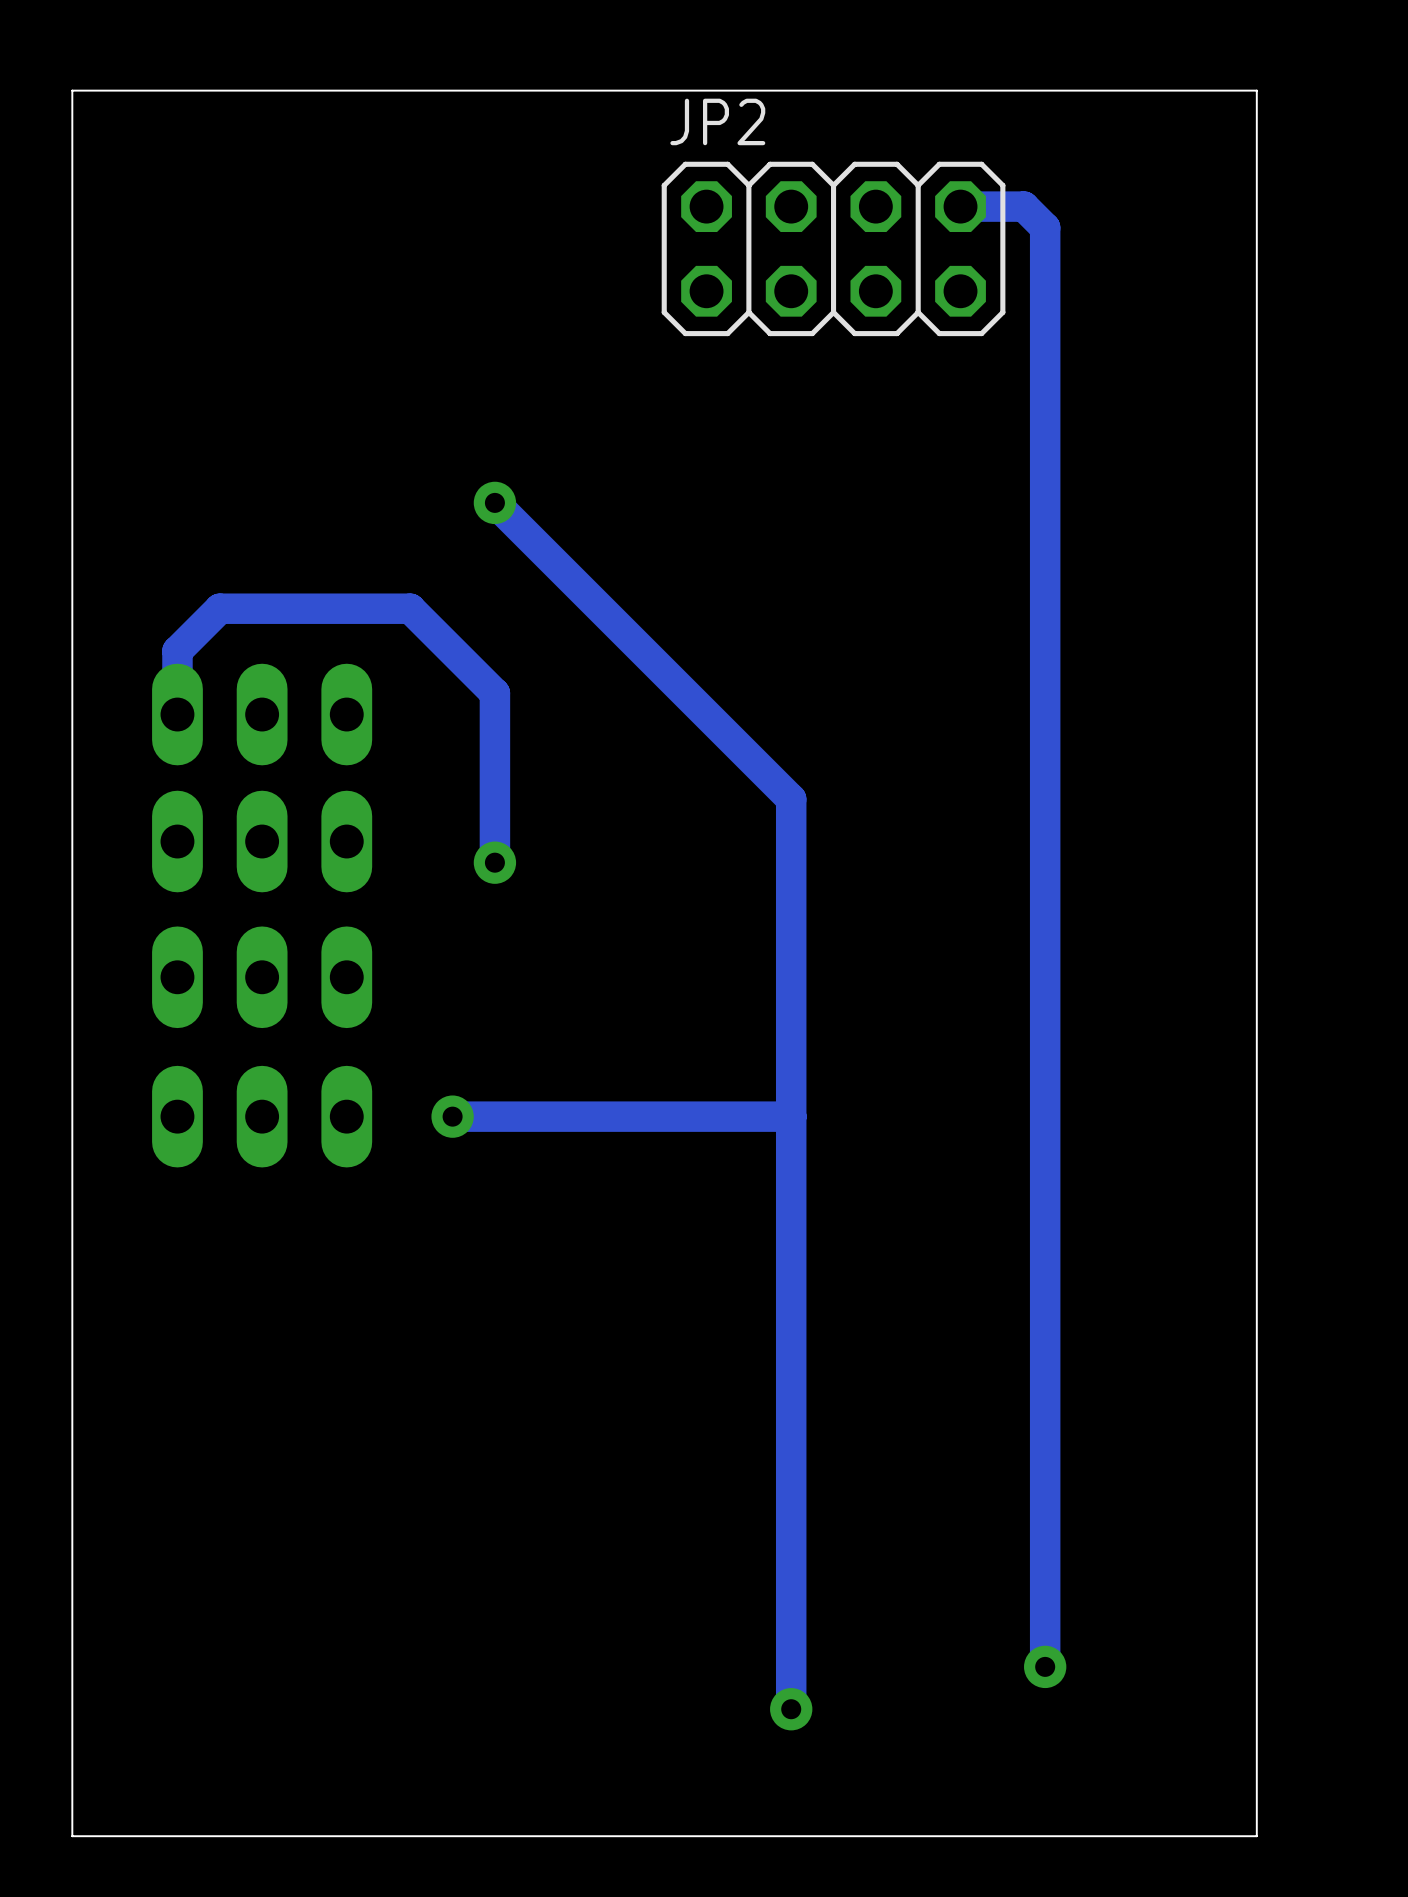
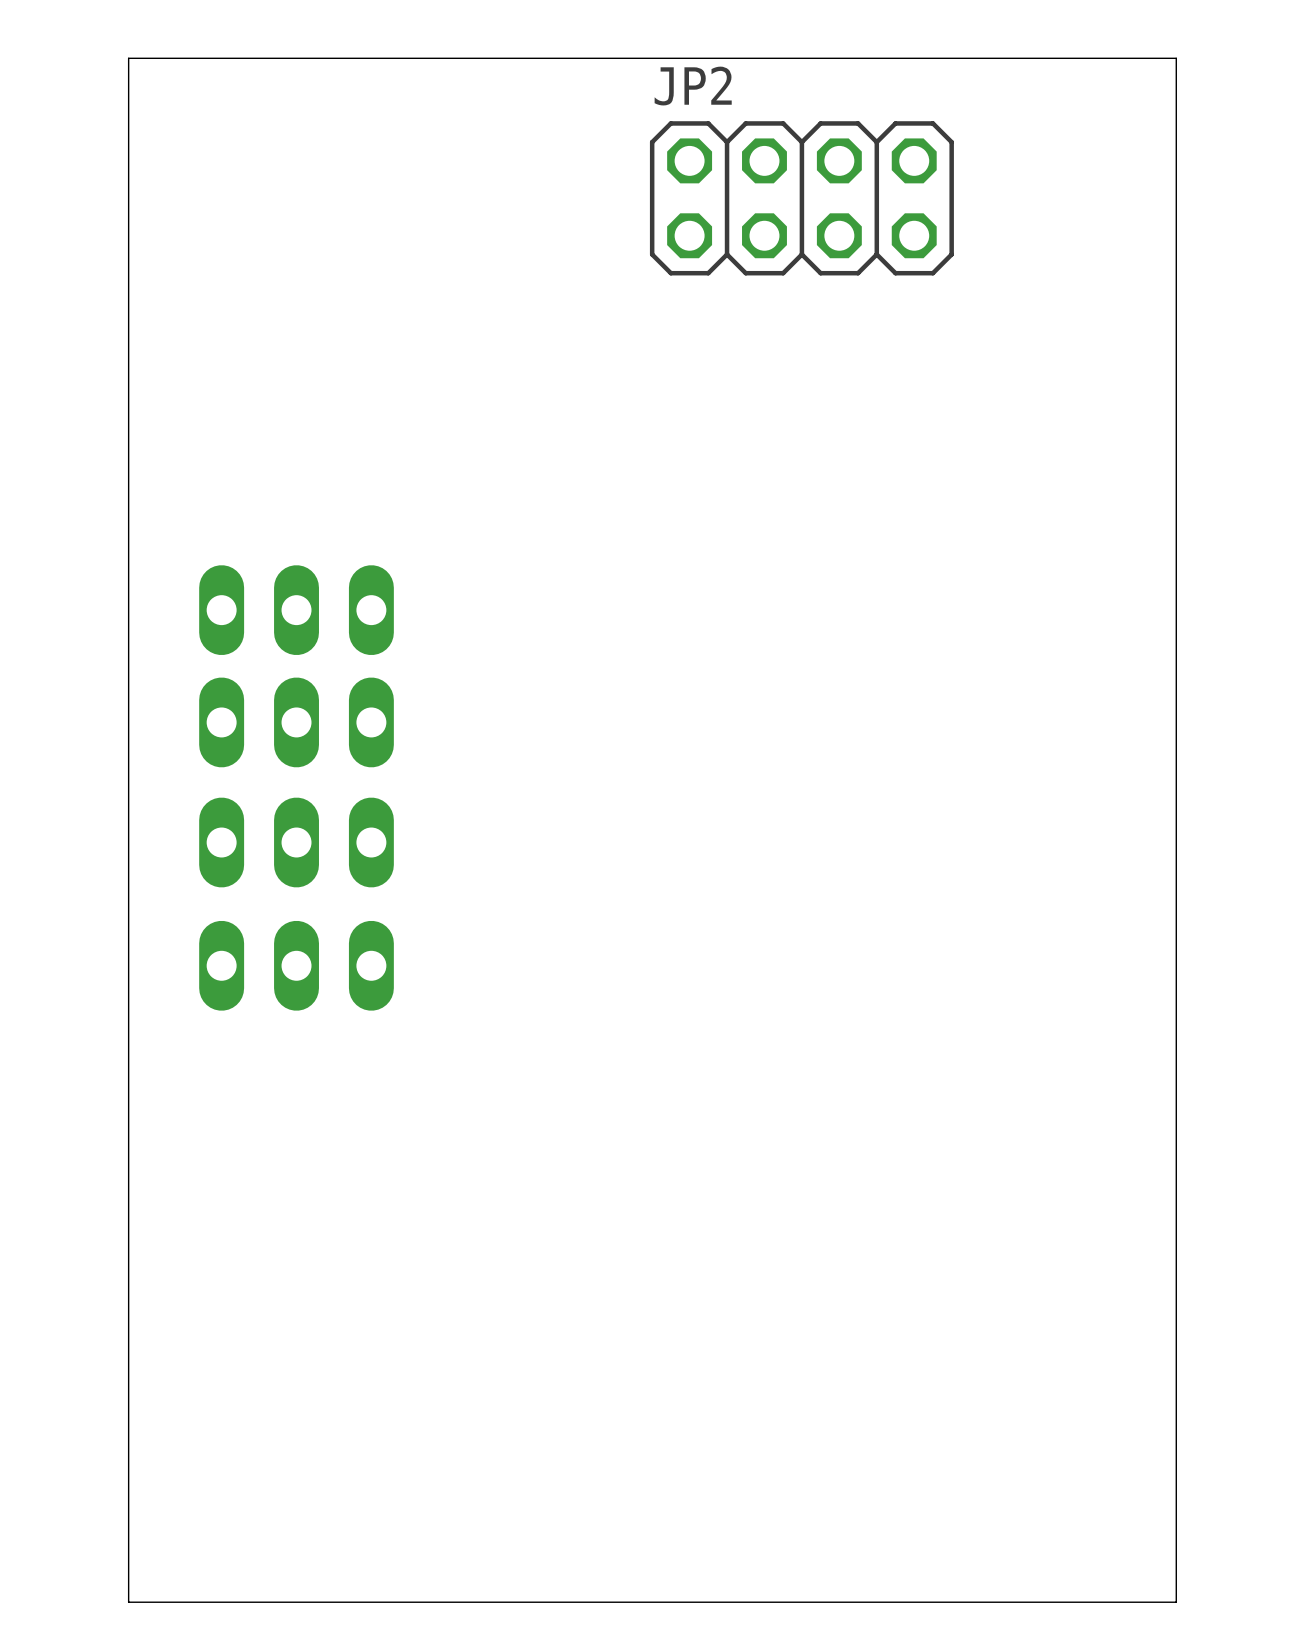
track: (960, 206) (1024, 206) (1045, 227) (1045, 1666) -> none
track: (494, 502) (791, 799) (791, 1709) -> none
via: (494, 502) -> none
track: (177, 714) (177, 651) (219, 608) (410, 608) (494, 693) (494, 862) -> none
via: (494, 862) -> none
via: (452, 1116) -> none
track: (791, 1116) (452, 1116) -> none
via: (1045, 1666) -> none
via: (791, 1709) -> none

